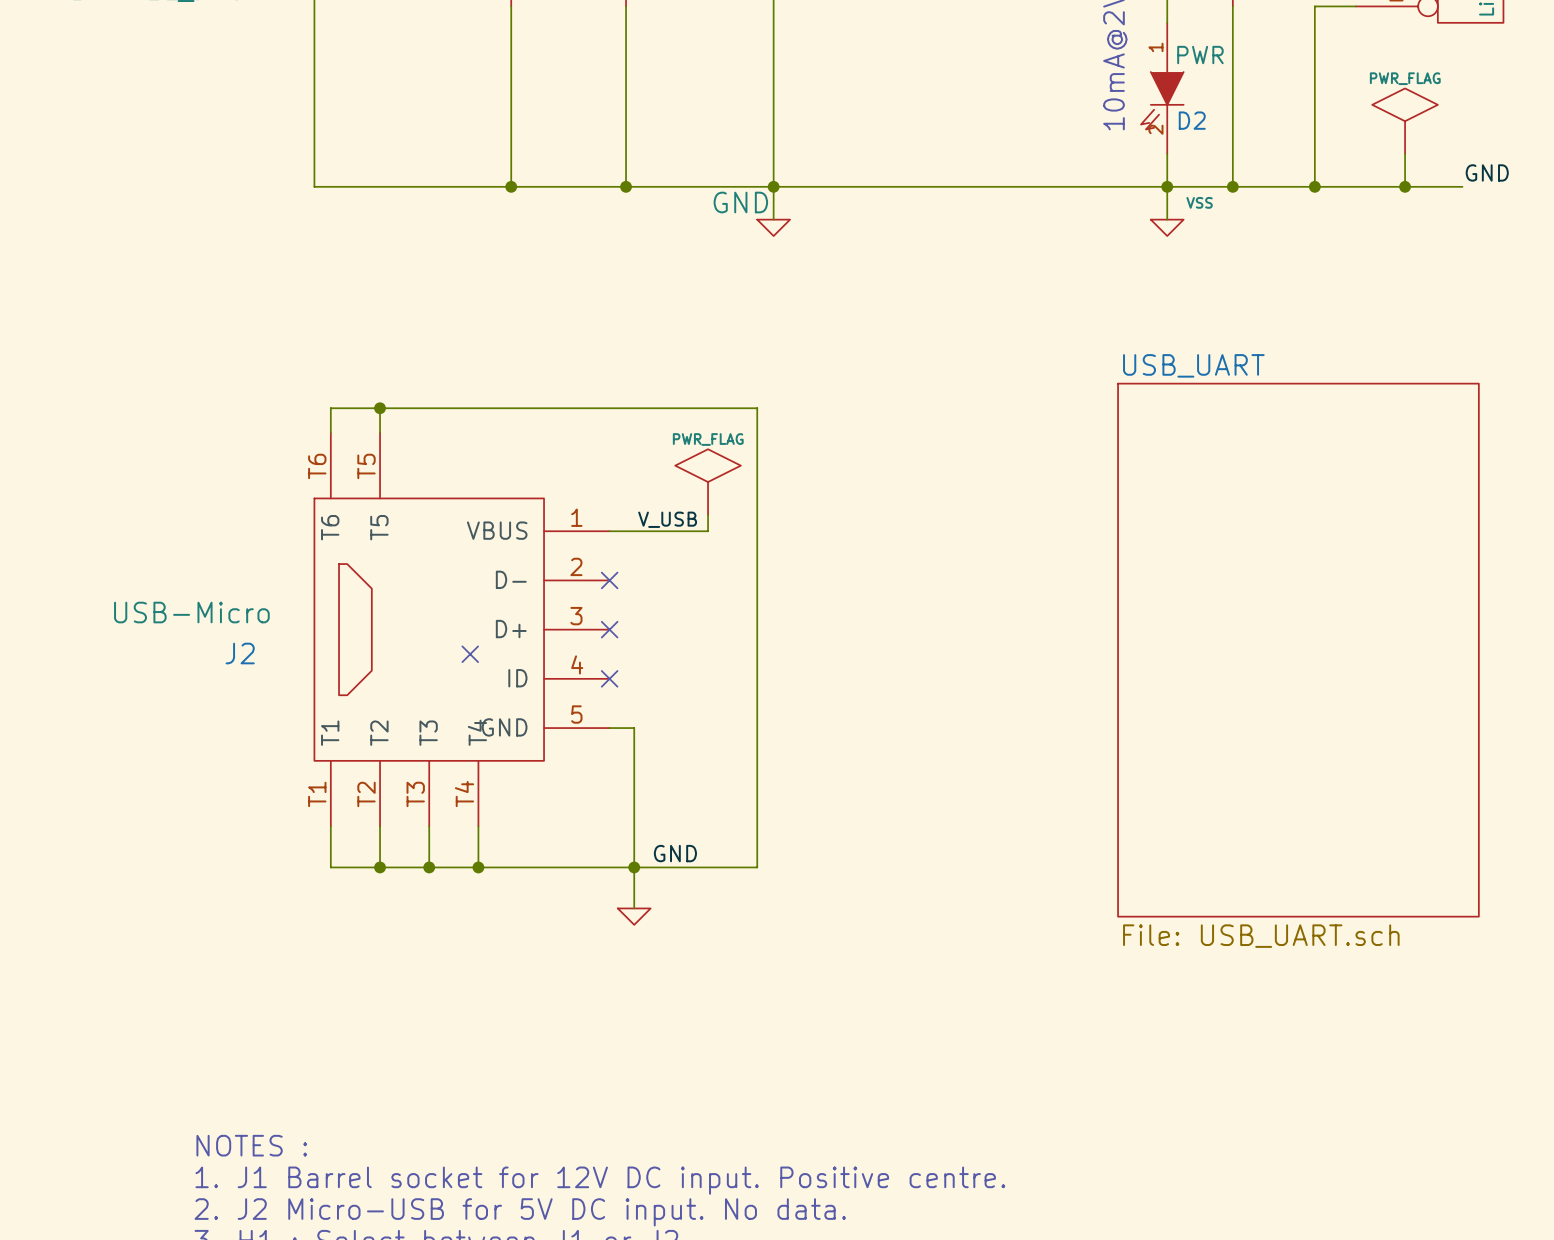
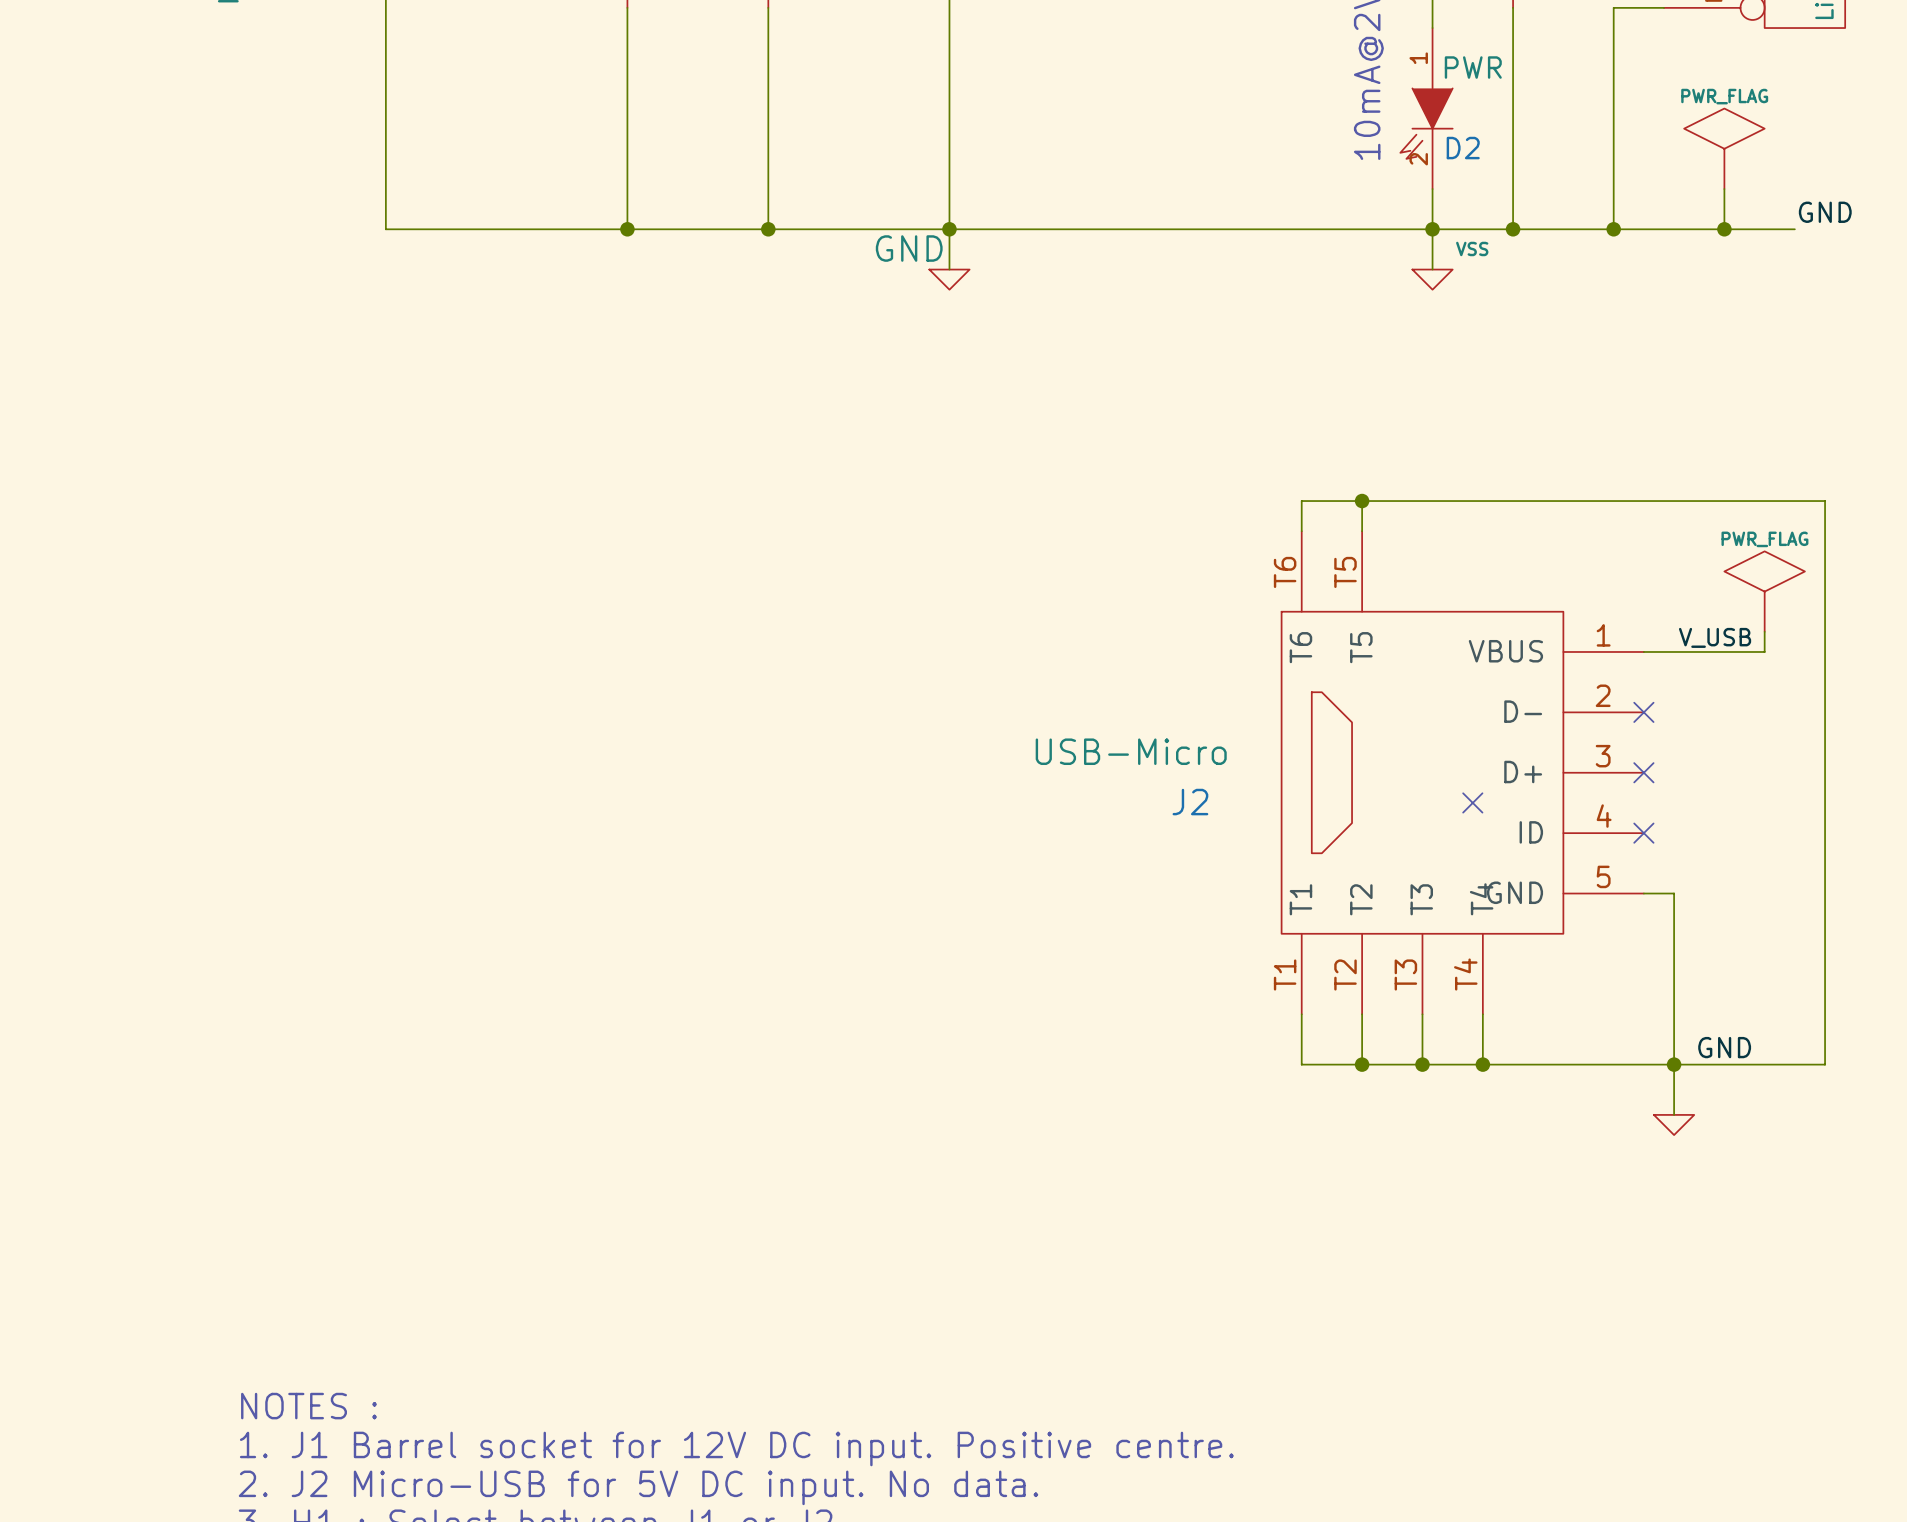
wire: (380, 408) (380, 432) -> none
junction: (380, 408) -> none
wire: none -> (1362, 501) (1362, 531)
junction: none -> (1362, 501)
wire: (330, 432) (330, 408) (757, 408) (757, 867) (330, 867) (330, 826) -> none
wire: none -> (1301, 531) (1301, 501) (1825, 501) (1825, 1064) (1301, 1064) (1301, 1014)
power symbol: PWR_FLAG (708, 482) -> none
power symbol: none -> PWR_FLAG (1764, 591)
wire: (708, 514) (708, 531) (609, 531) -> none
wire: none -> (1764, 631) (1764, 651) (1643, 651)
label: V_USB (667, 519) -> none
label: none -> V_USB (1715, 637)
no-connect mark: (609, 580) -> none
no-connect mark: none -> (1643, 712)
J2 position: (462, 629) -> (1462, 772)
no-connect mark: (609, 629) -> none
no-connect mark: none -> (1643, 772)
sheet USB_UART: File: USB_UART.sch (1298, 650) -> none
no-connect mark: (470, 654) -> none
no-connect mark: none -> (1472, 802)
no-connect mark: (609, 678) -> none
no-connect mark: none -> (1643, 833)
wire: (609, 728) (634, 728) (634, 908) -> none
wire: none -> (1643, 893) (1674, 893) (1674, 1114)
wire: (380, 826) (380, 867) -> none
wire: (429, 826) (429, 867) -> none
wire: (478, 826) (478, 867) -> none
wire: none -> (1362, 1014) (1362, 1064)
wire: none -> (1422, 1014) (1422, 1064)
wire: none -> (1482, 1014) (1482, 1064)
label: GND (675, 853) -> none
label: none -> GND (1724, 1047)
junction: (380, 867) -> none
junction: (429, 867) -> none
junction: (478, 867) -> none
junction: (634, 867) -> none
junction: none -> (1362, 1064)
junction: none -> (1422, 1064)
junction: none -> (1482, 1064)
junction: none -> (1674, 1064)
power symbol: (634, 916) -> none
power symbol: none -> (1674, 1124)

